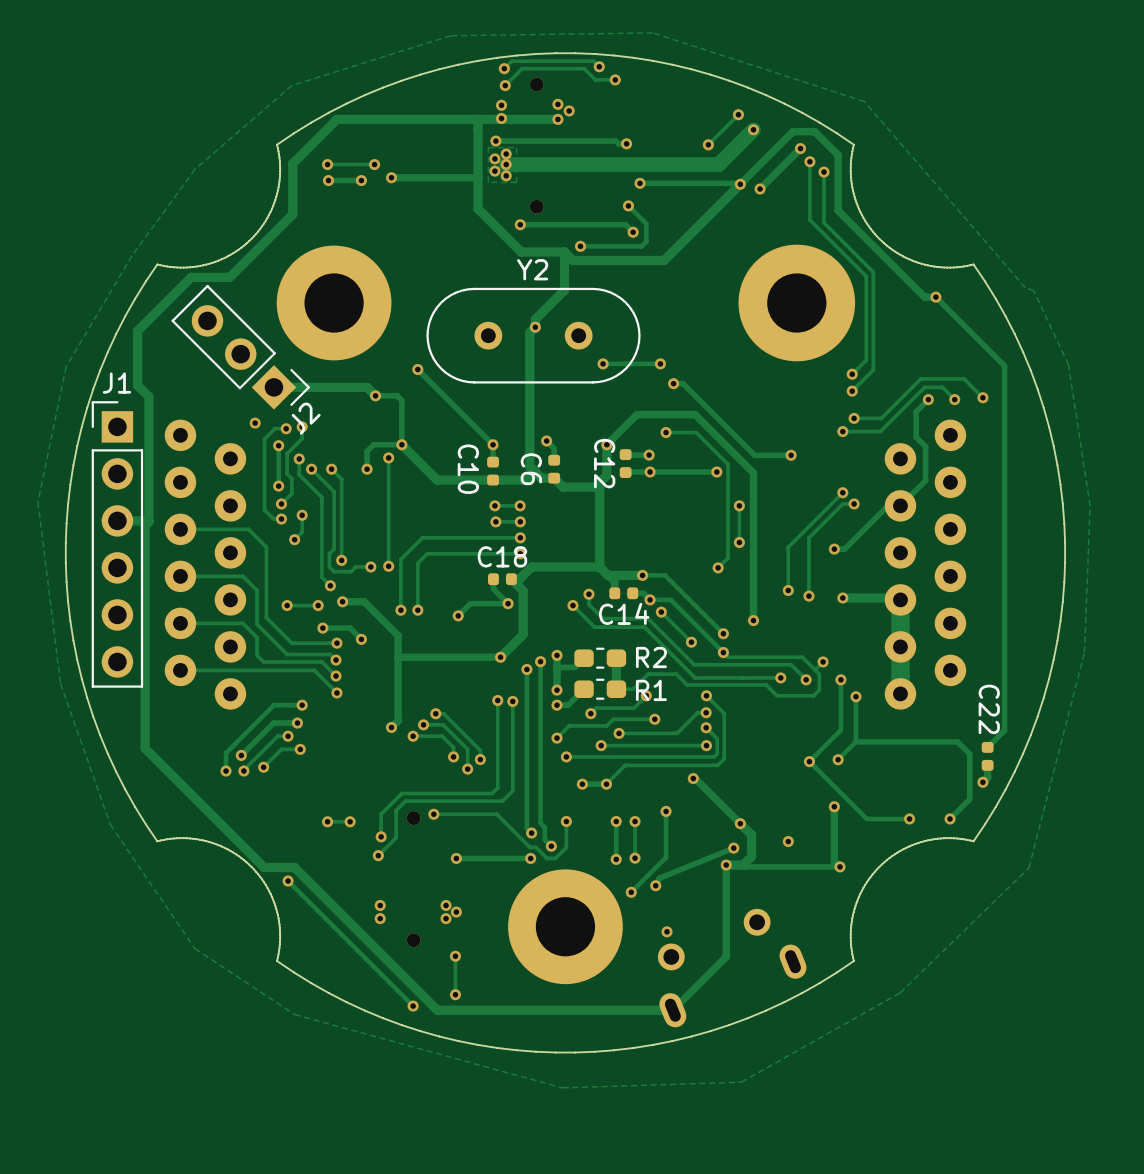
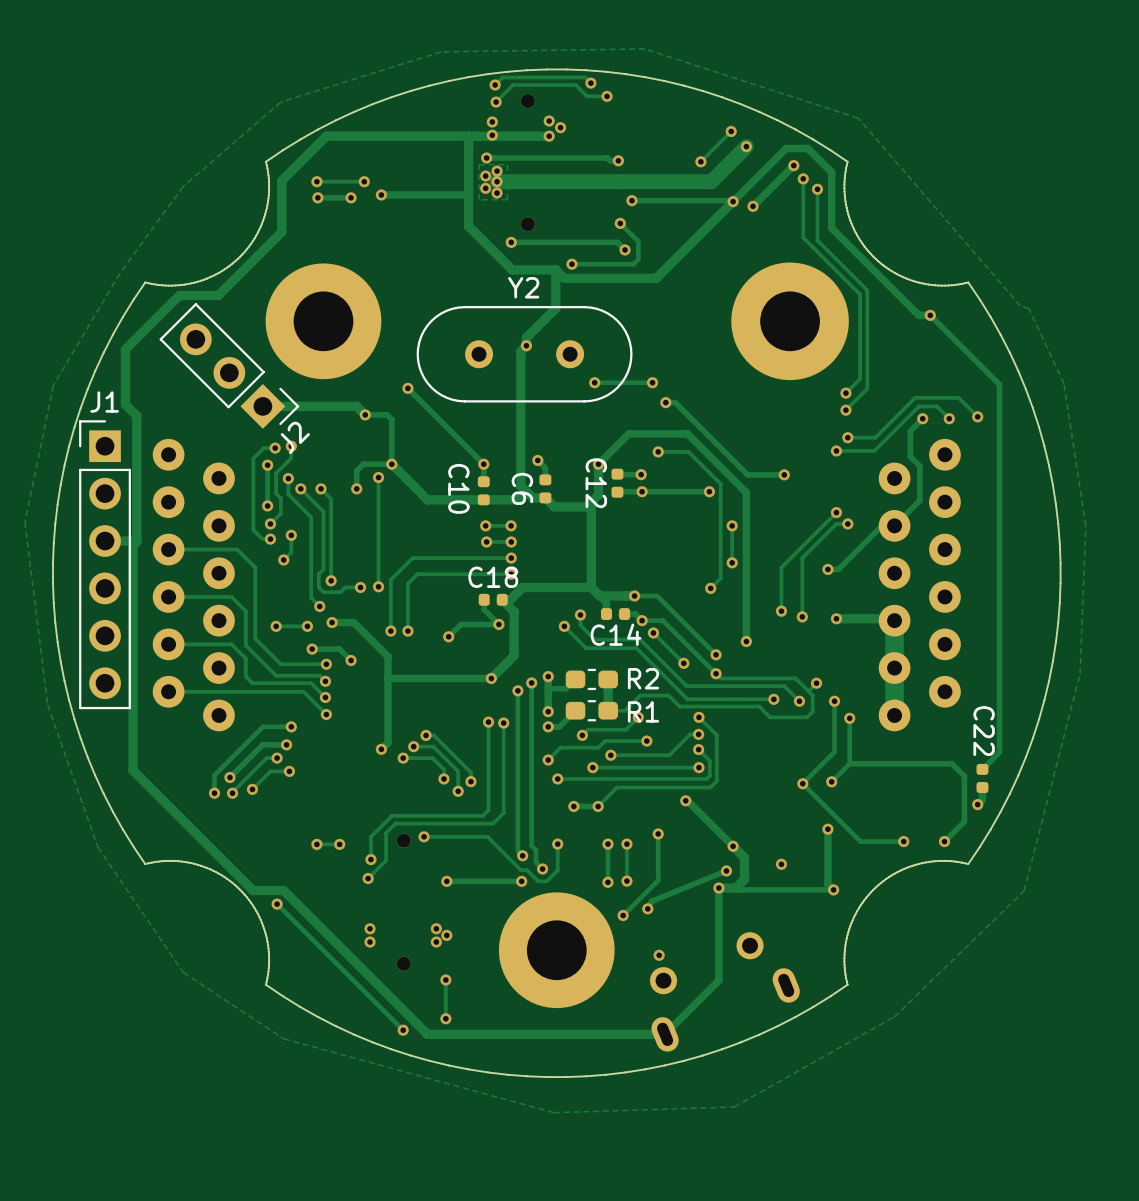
via: (255, 423) -> none

